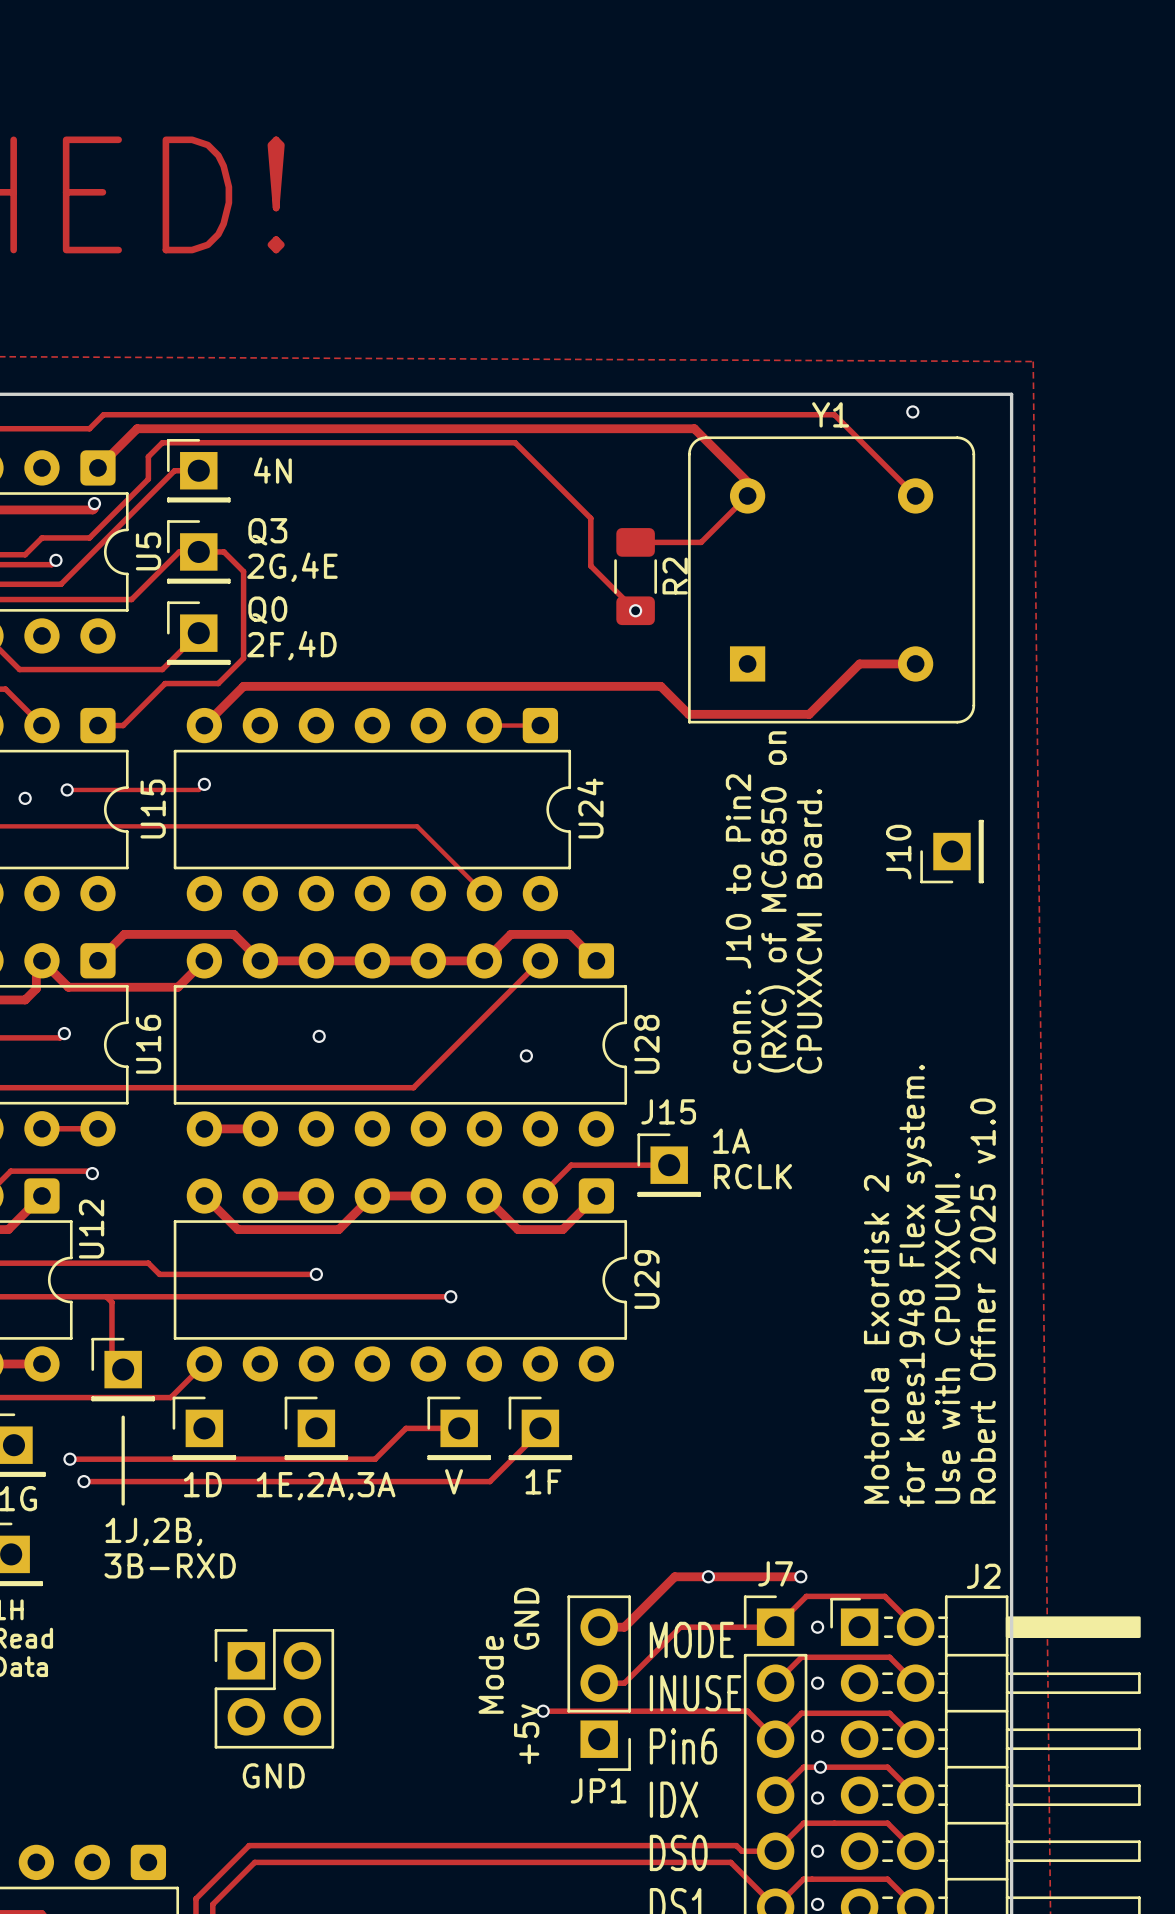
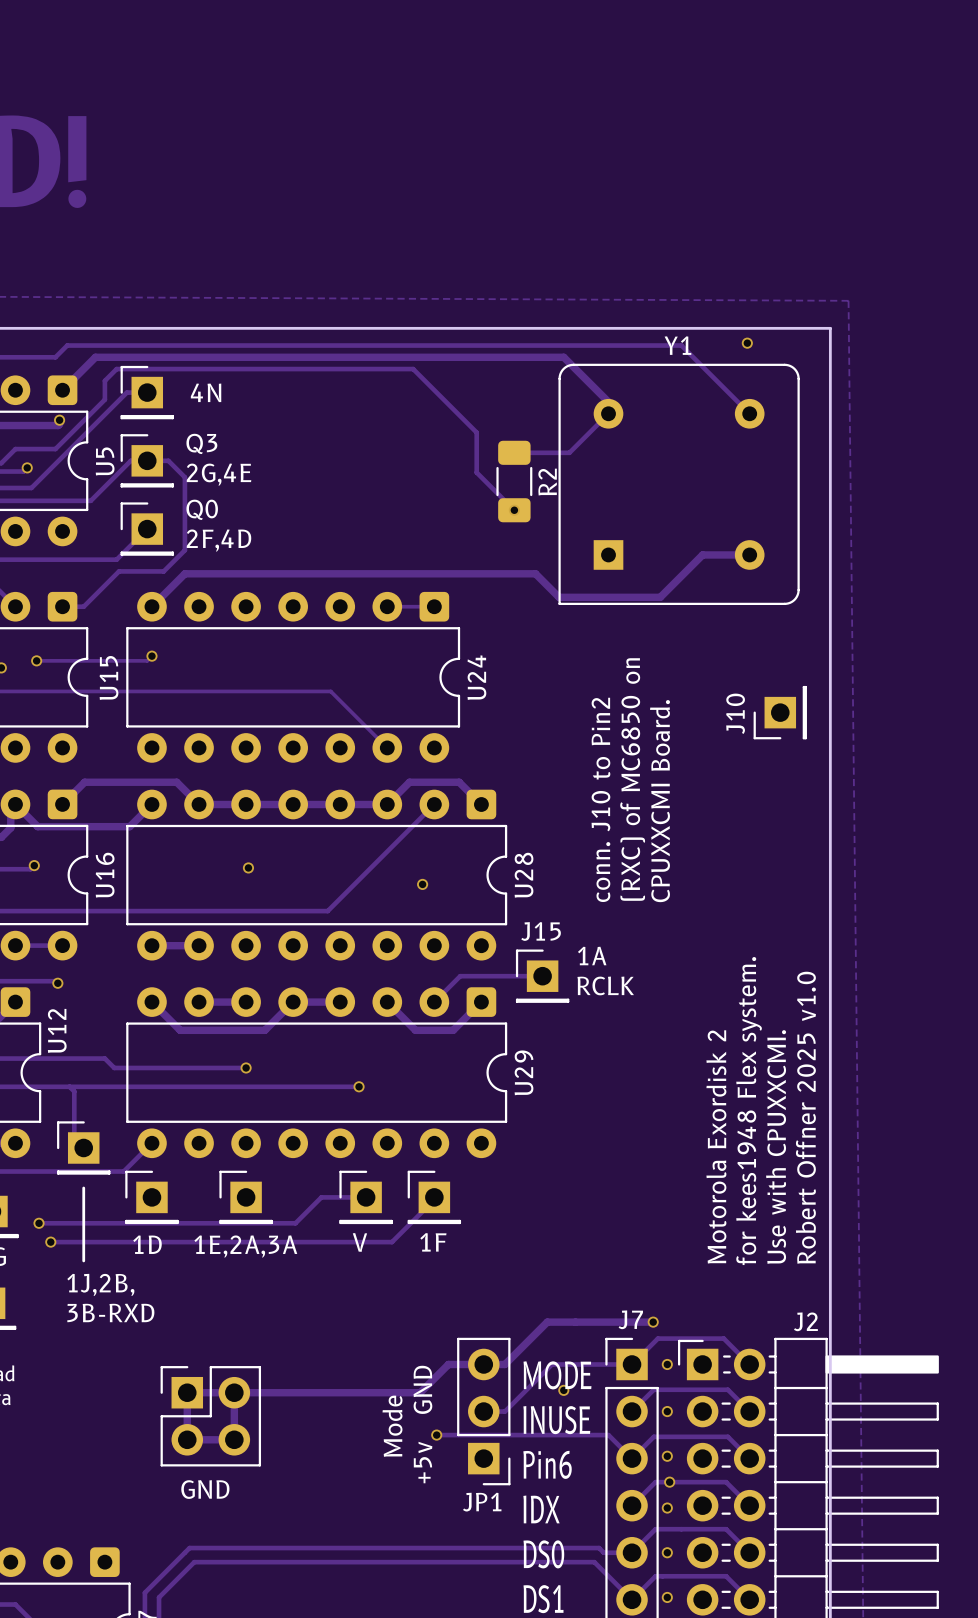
via position: (708, 1576) -> (563, 1390)
track: none -> (483, 1364) (448, 1364) (420, 1392) (187, 1392) (187, 1439) (234, 1439) (234, 1392)

